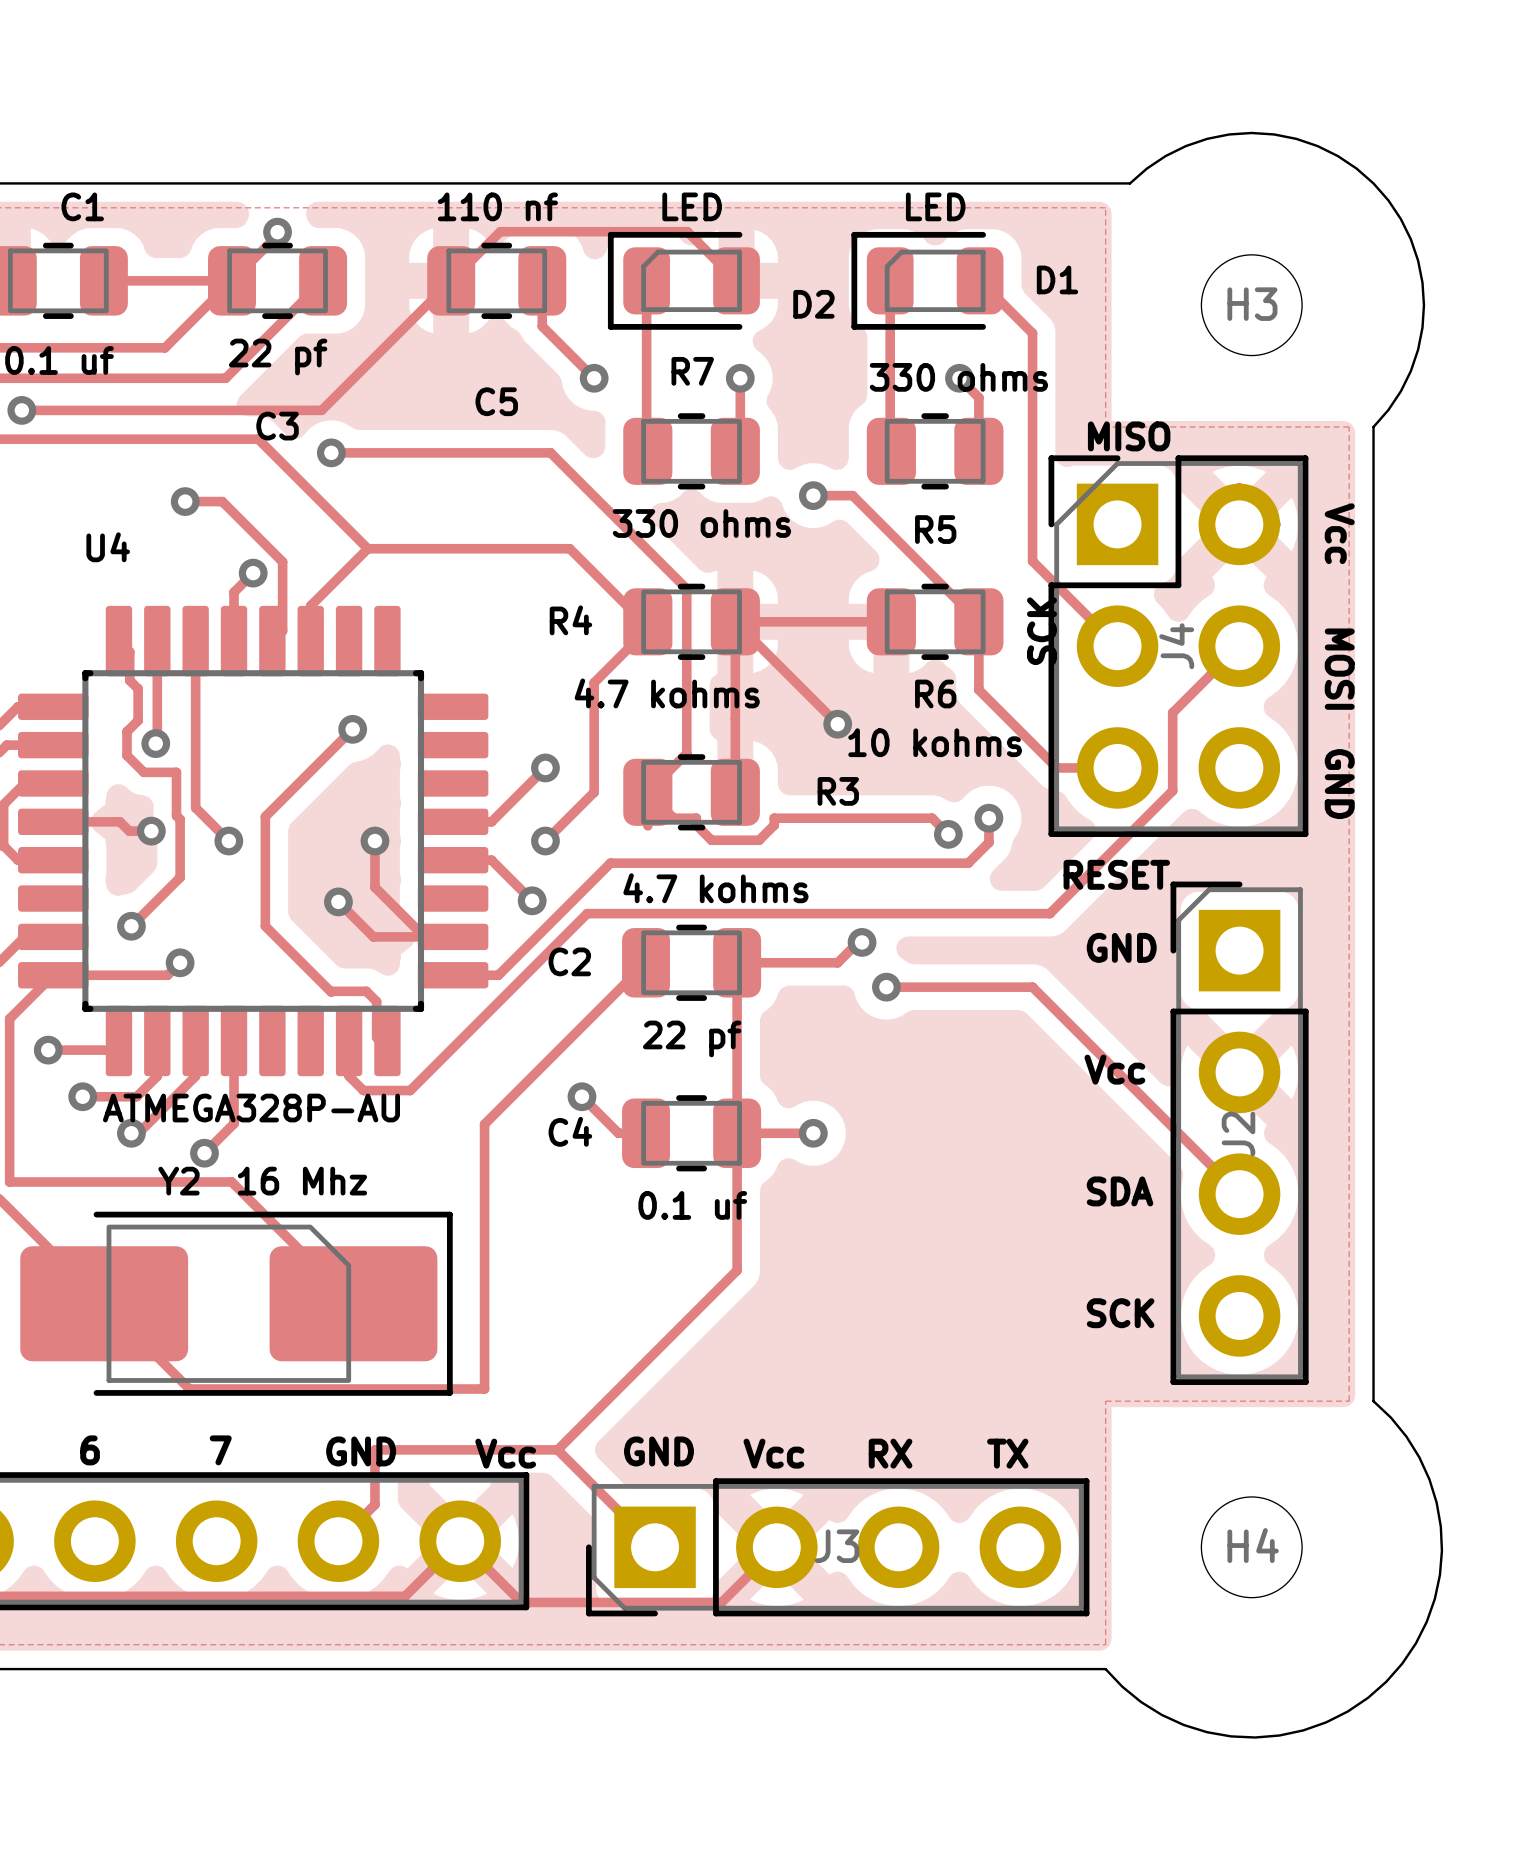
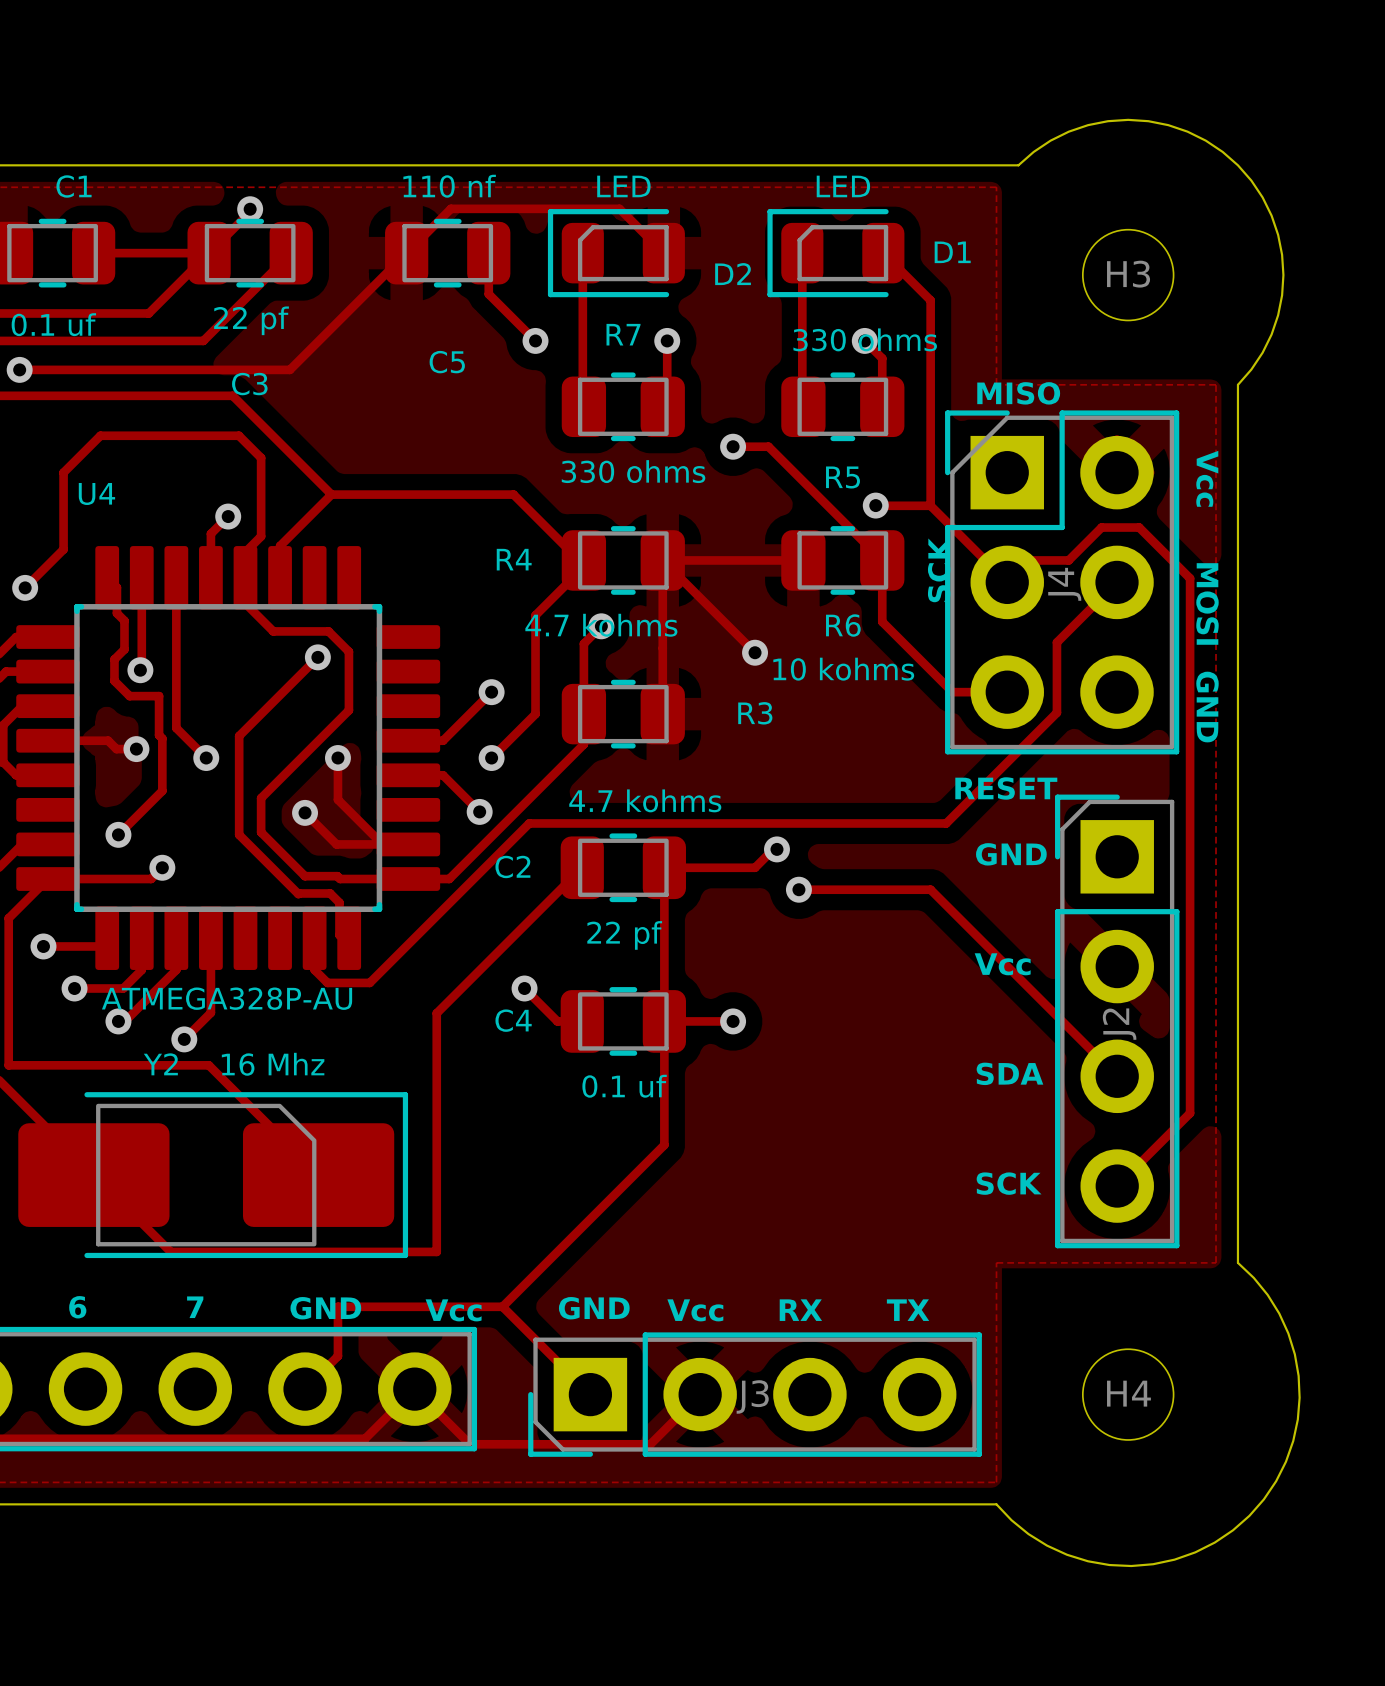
track: (331, 452) (550, 452) (686, 588) (686, 753) (647, 792) (673, 818) (696, 818) (696, 825) (711, 840) (759, 840) (774, 825) (774, 818) (932, 818) (948, 834) -> none
via: (331, 452) -> none
track: (185, 501) (222, 501) (282, 561) (282, 630) (272, 641) -> none
via: (185, 501) -> none
via: none -> (875, 505)
track: none -> (875, 505) (930, 505)
track: none -> (245, 552) (261, 536) (261, 457) (238, 435) (100, 435) (63, 472) (63, 549) (25, 587)
track: none -> (1029, 560) (1068, 560) (1101, 527) (1139, 527) (1190, 578) (1190, 1113) (1117, 1186)
via: none -> (25, 587)
track: none -> (245, 603) (273, 631) (328, 631) (348, 651) (348, 710) (261, 798) (261, 832) (304, 876) (337, 876) (340, 879) (408, 879)
track: none -> (601, 626) (583, 643) (583, 714)
via: none -> (601, 626)
track: (988, 818) (988, 842) (968, 863) (610, 863) -> (583, 744) (550, 777)
via: (988, 818) -> none
via: (948, 834) -> none

